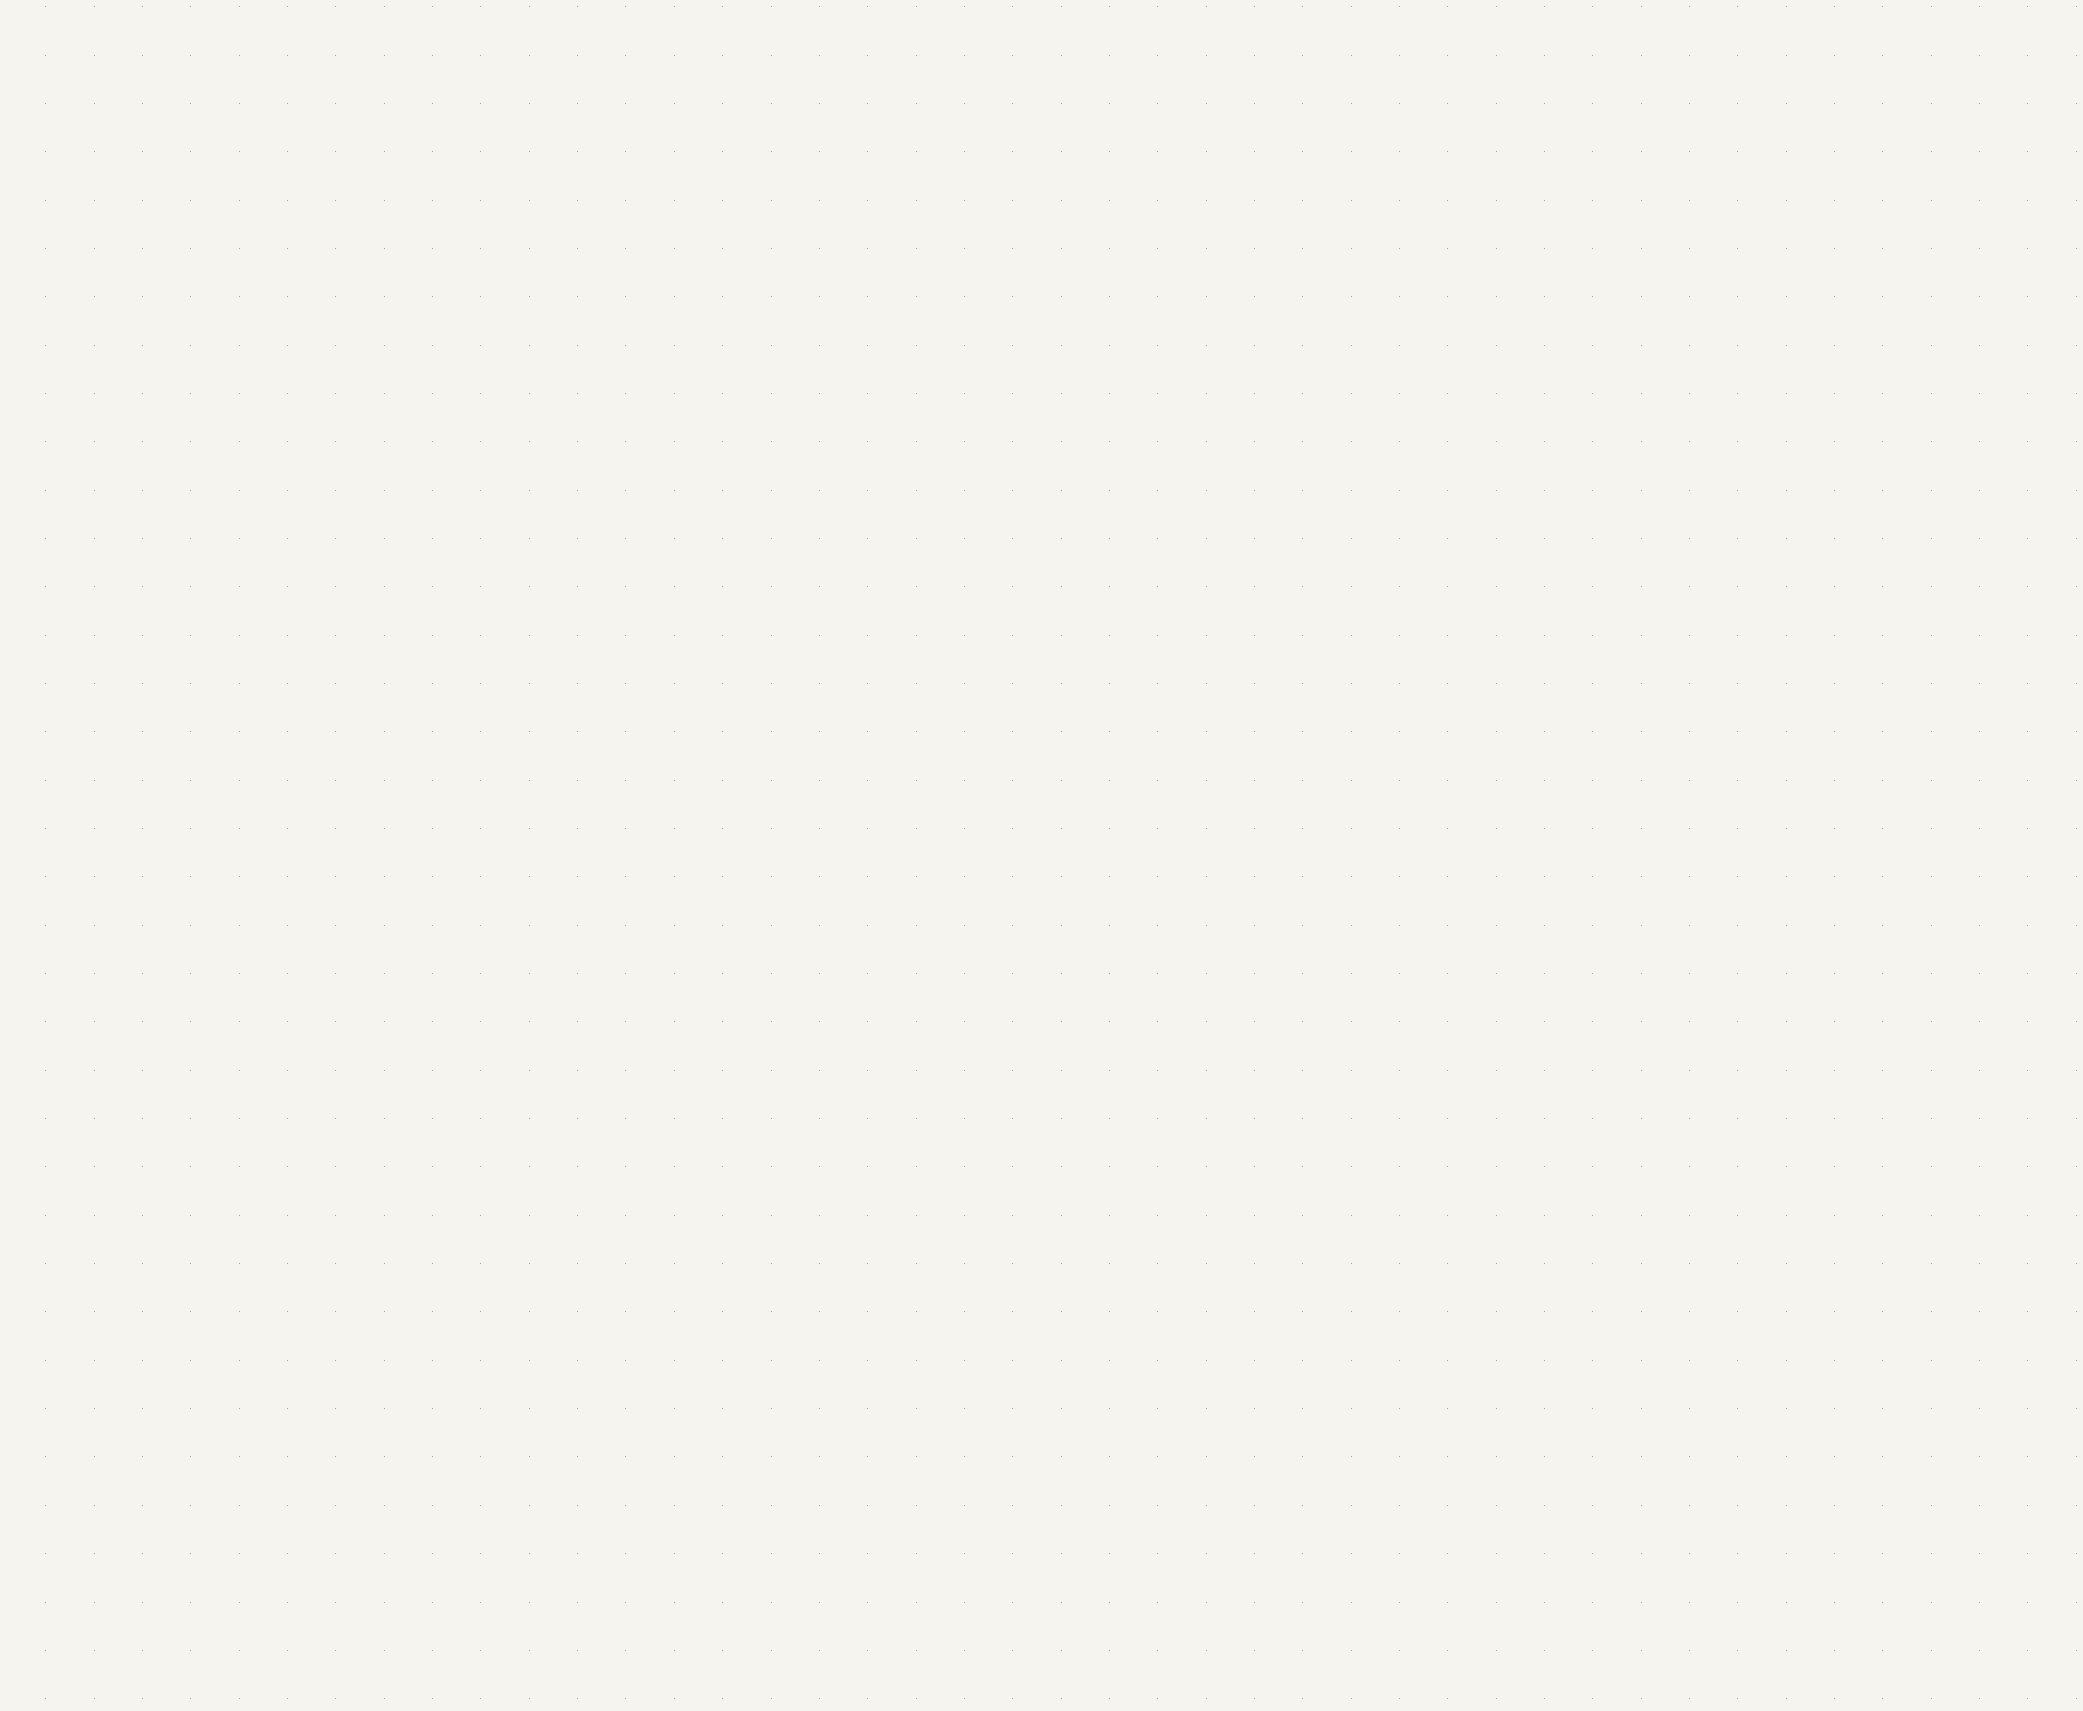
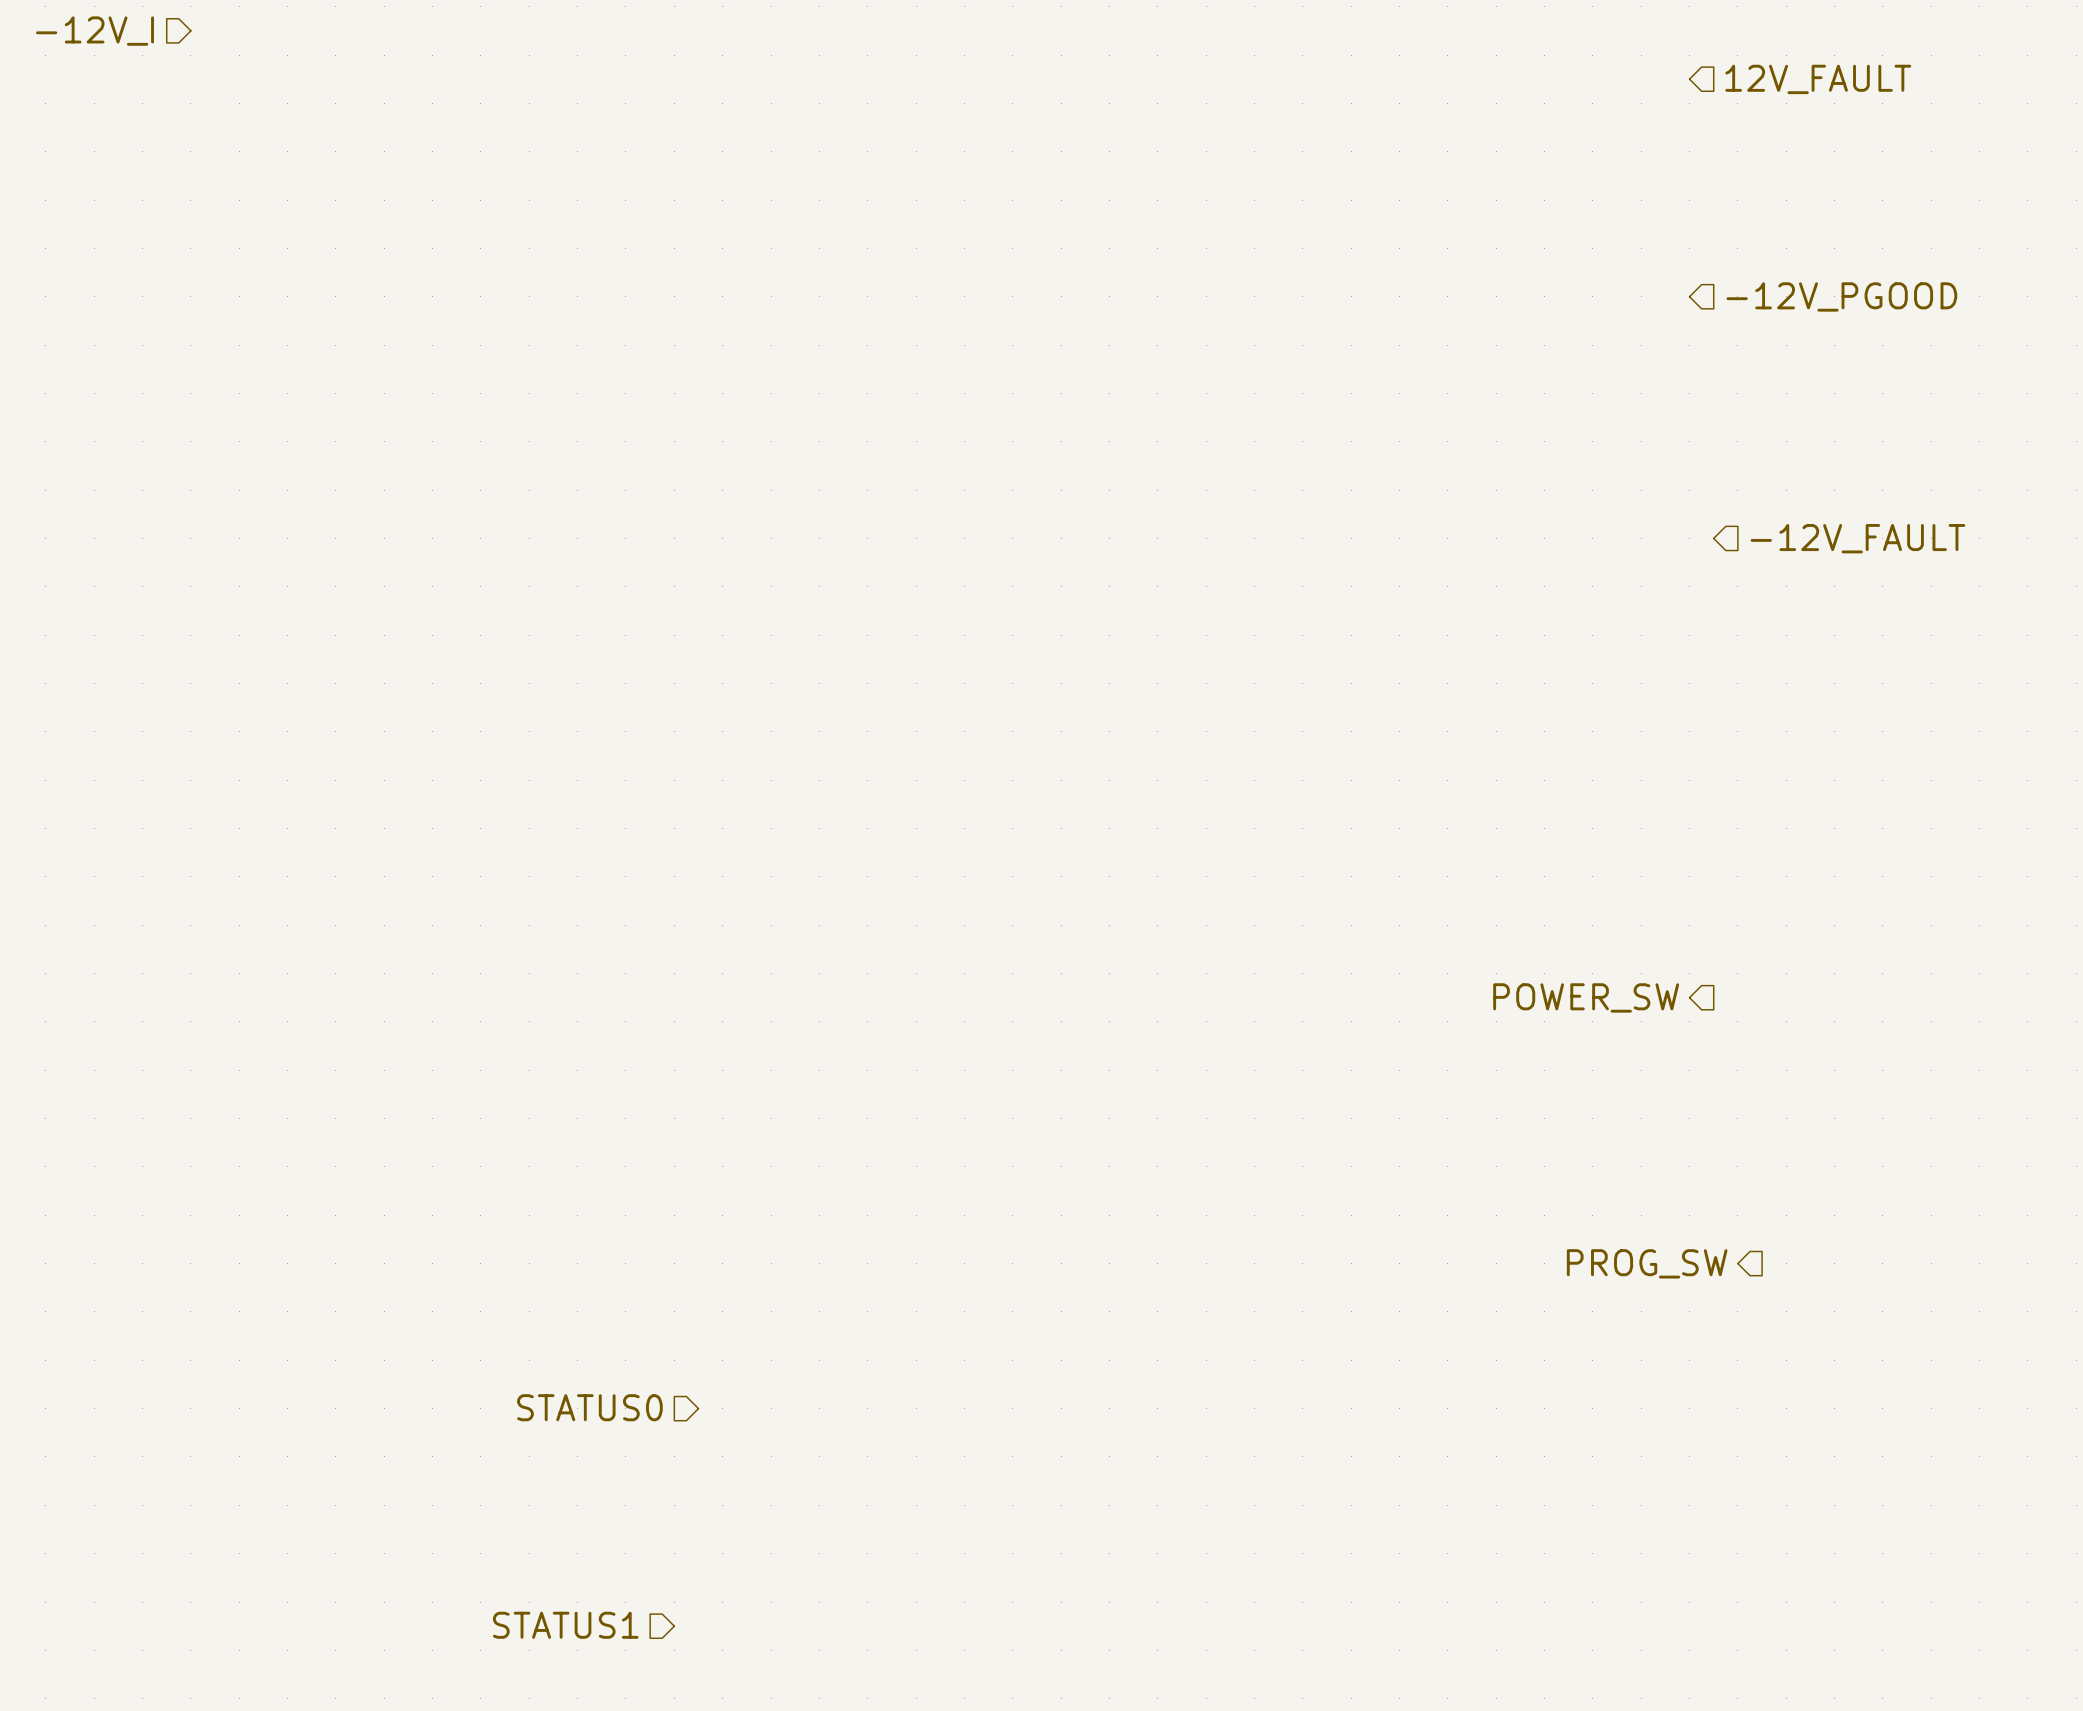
hierarchical label: none -> -12V_I (94, 31)
hierarchical label: none -> 12V_FAULT (1818, 79)
hierarchical label: none -> -12V_PGOOD (1841, 296)
hierarchical label: none -> -12V_FAULT (1857, 538)
hierarchical label: none -> POWER_SW (1586, 997)
hierarchical label: none -> PROG_SW (1647, 1263)
hierarchical label: none -> STATUS0 (589, 1407)
hierarchical label: none -> STATUS1 (565, 1625)

